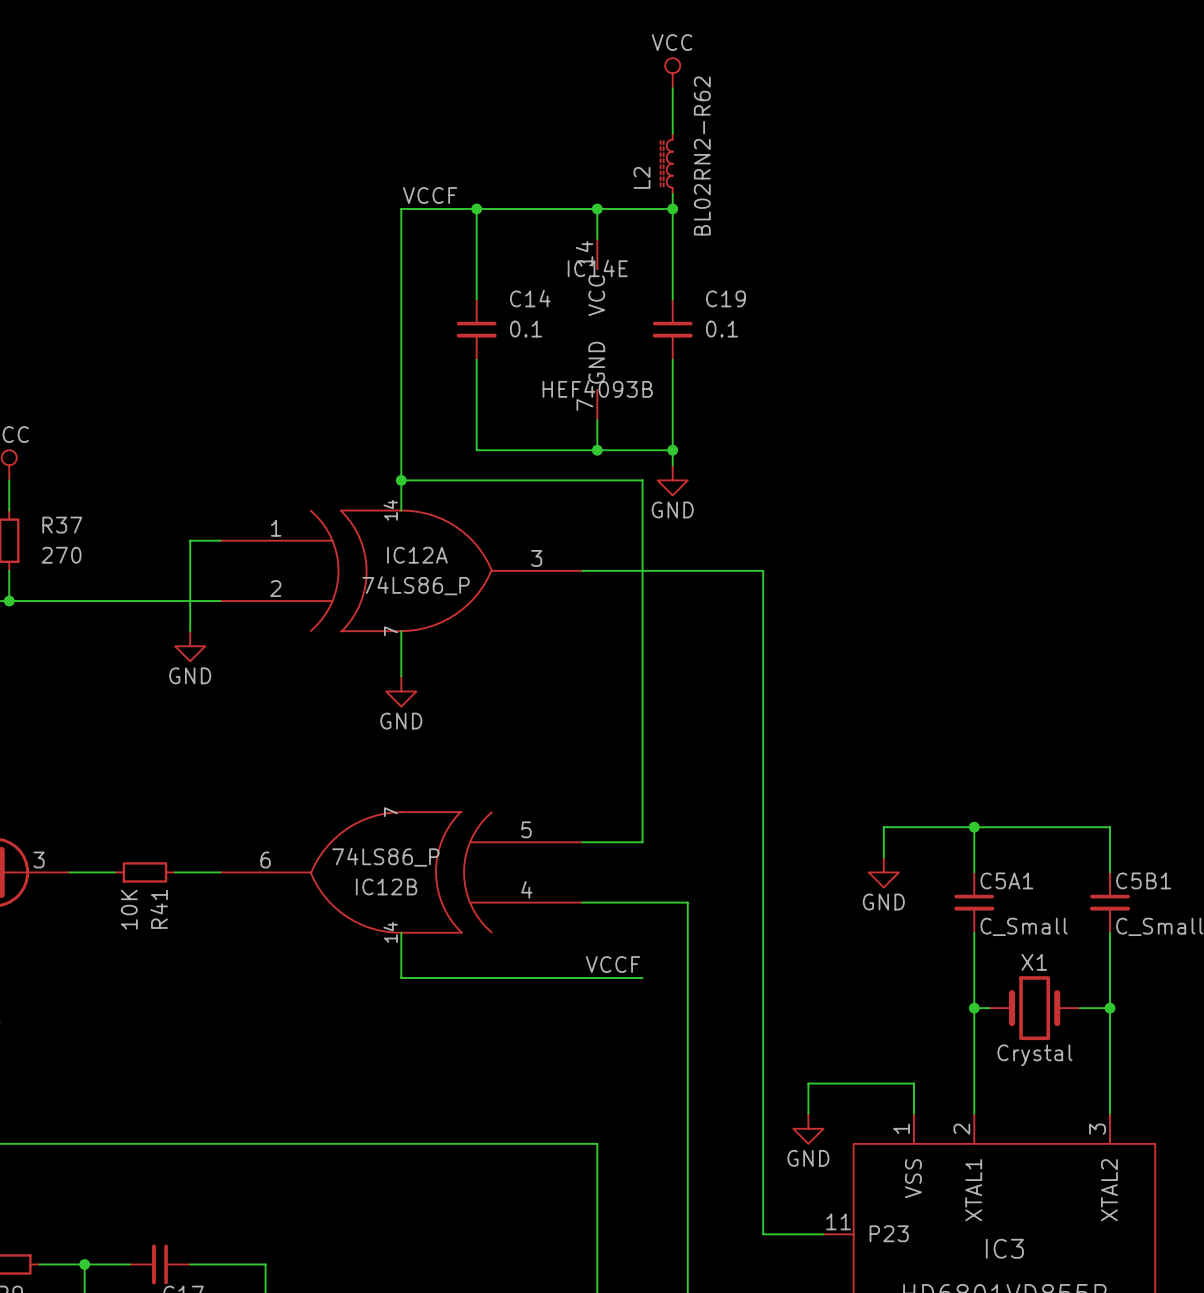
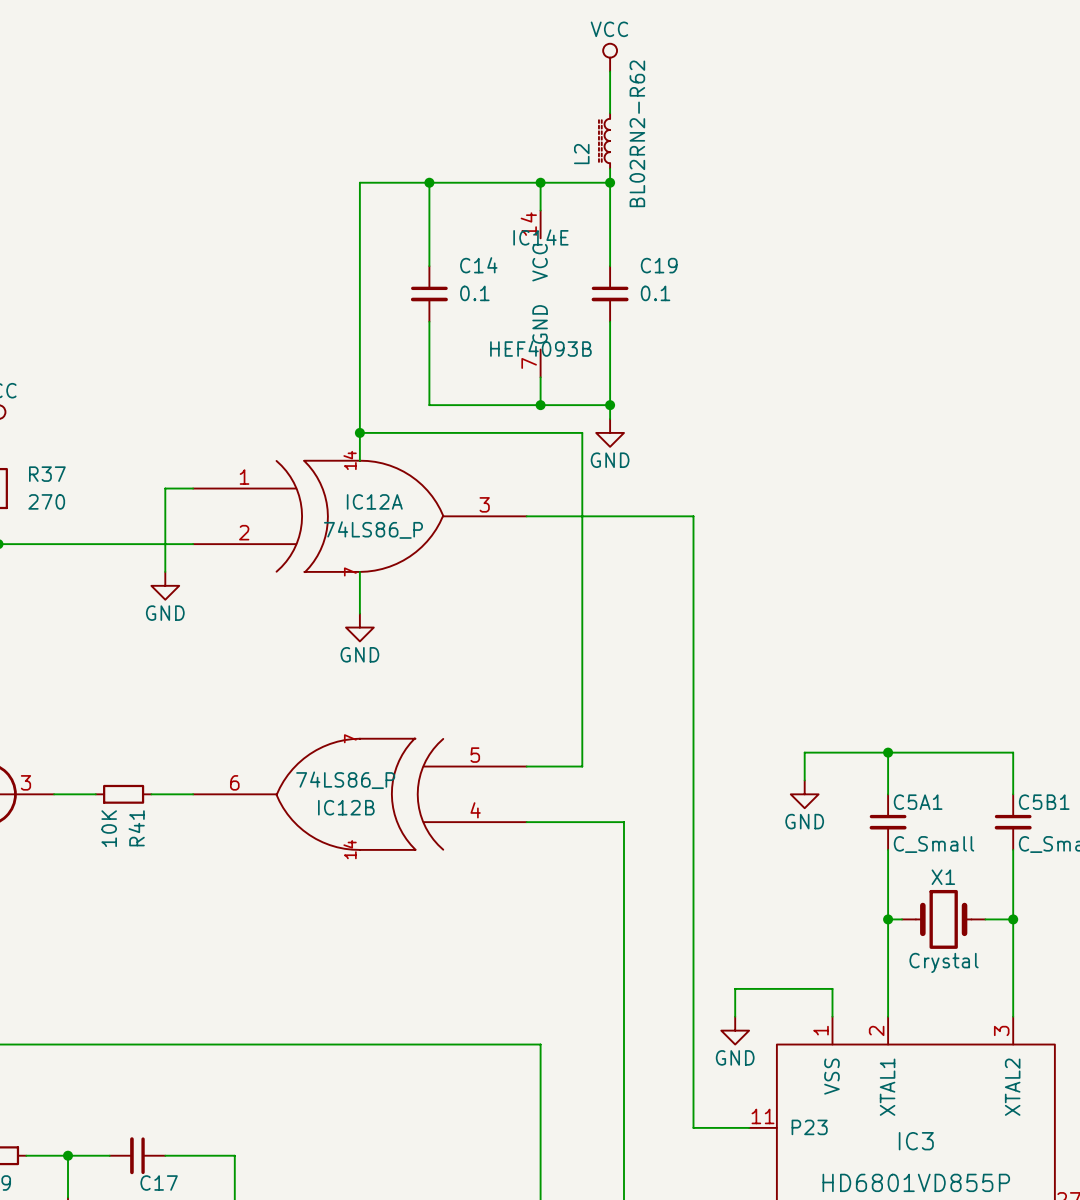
label: VCCF (430, 195) -> none
wire: (401, 932) (401, 977) (642, 977) -> none
label: VCCF (613, 964) -> none

